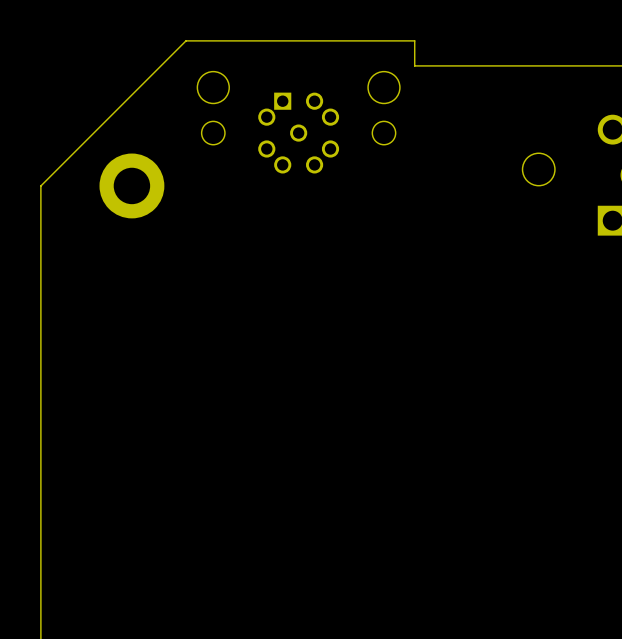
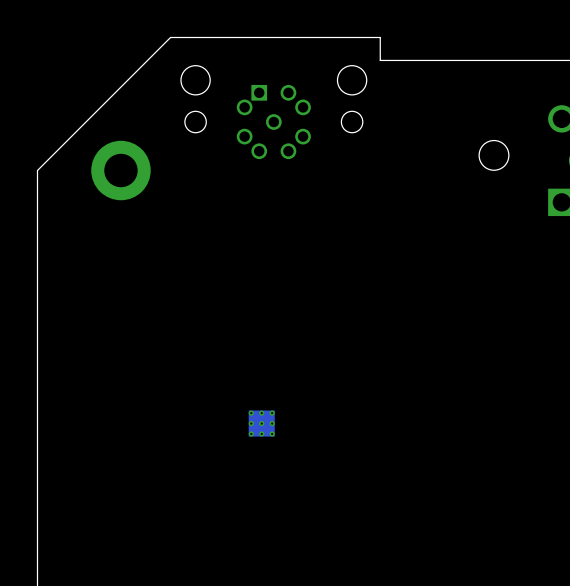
part: none -> (261, 423)

